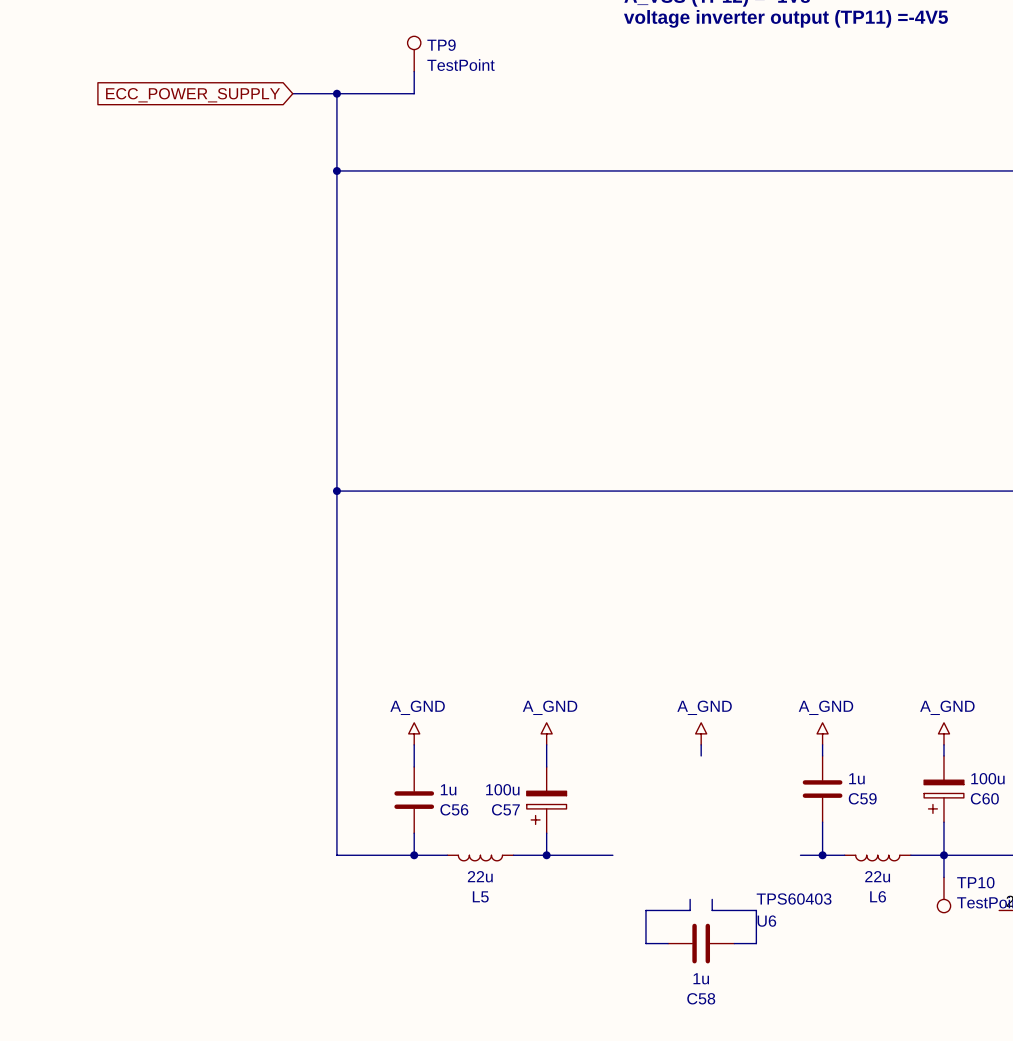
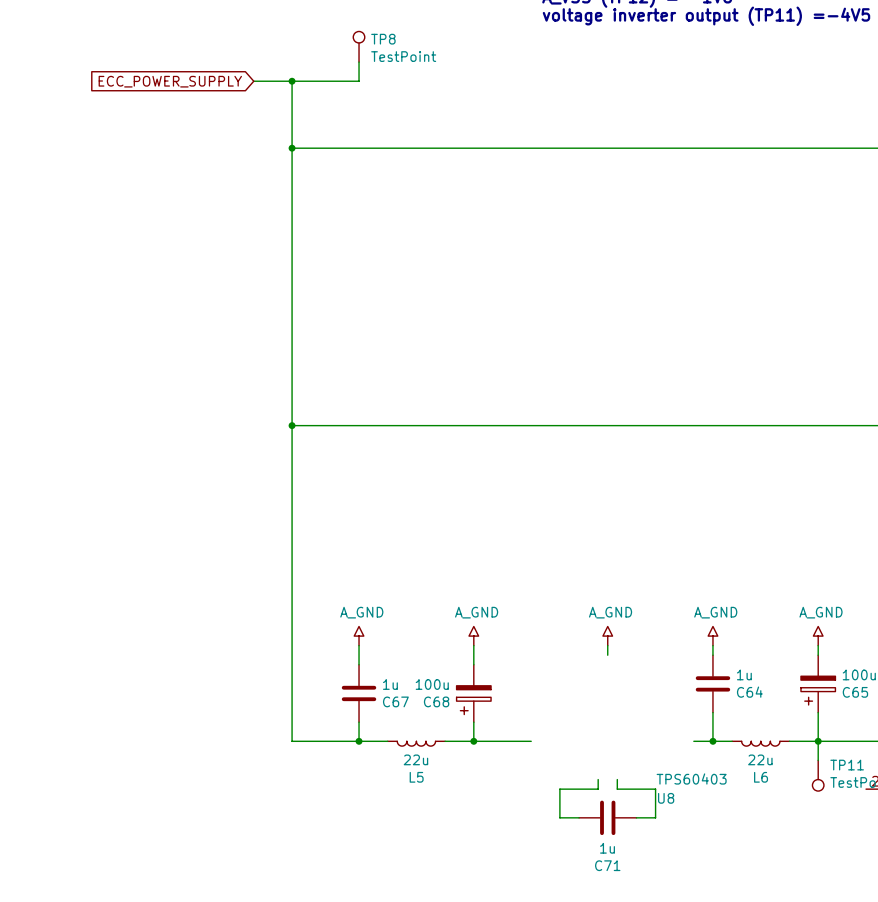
TP9 name: TP9 (441, 45) -> TP8 (383, 39)
C59 name: C59 (862, 798) -> C64 (749, 692)
C60 name: C60 (984, 798) -> C65 (855, 692)
C56 name: C56 (454, 809) -> C67 (395, 701)
C57 name: C57 (505, 809) -> C68 (436, 701)
TP10 name: TP10 (975, 882) -> TP11 (847, 765)
U6 name: U6 (766, 921) -> U8 (666, 798)
C58 name: C58 (701, 998) -> C71 (607, 865)

